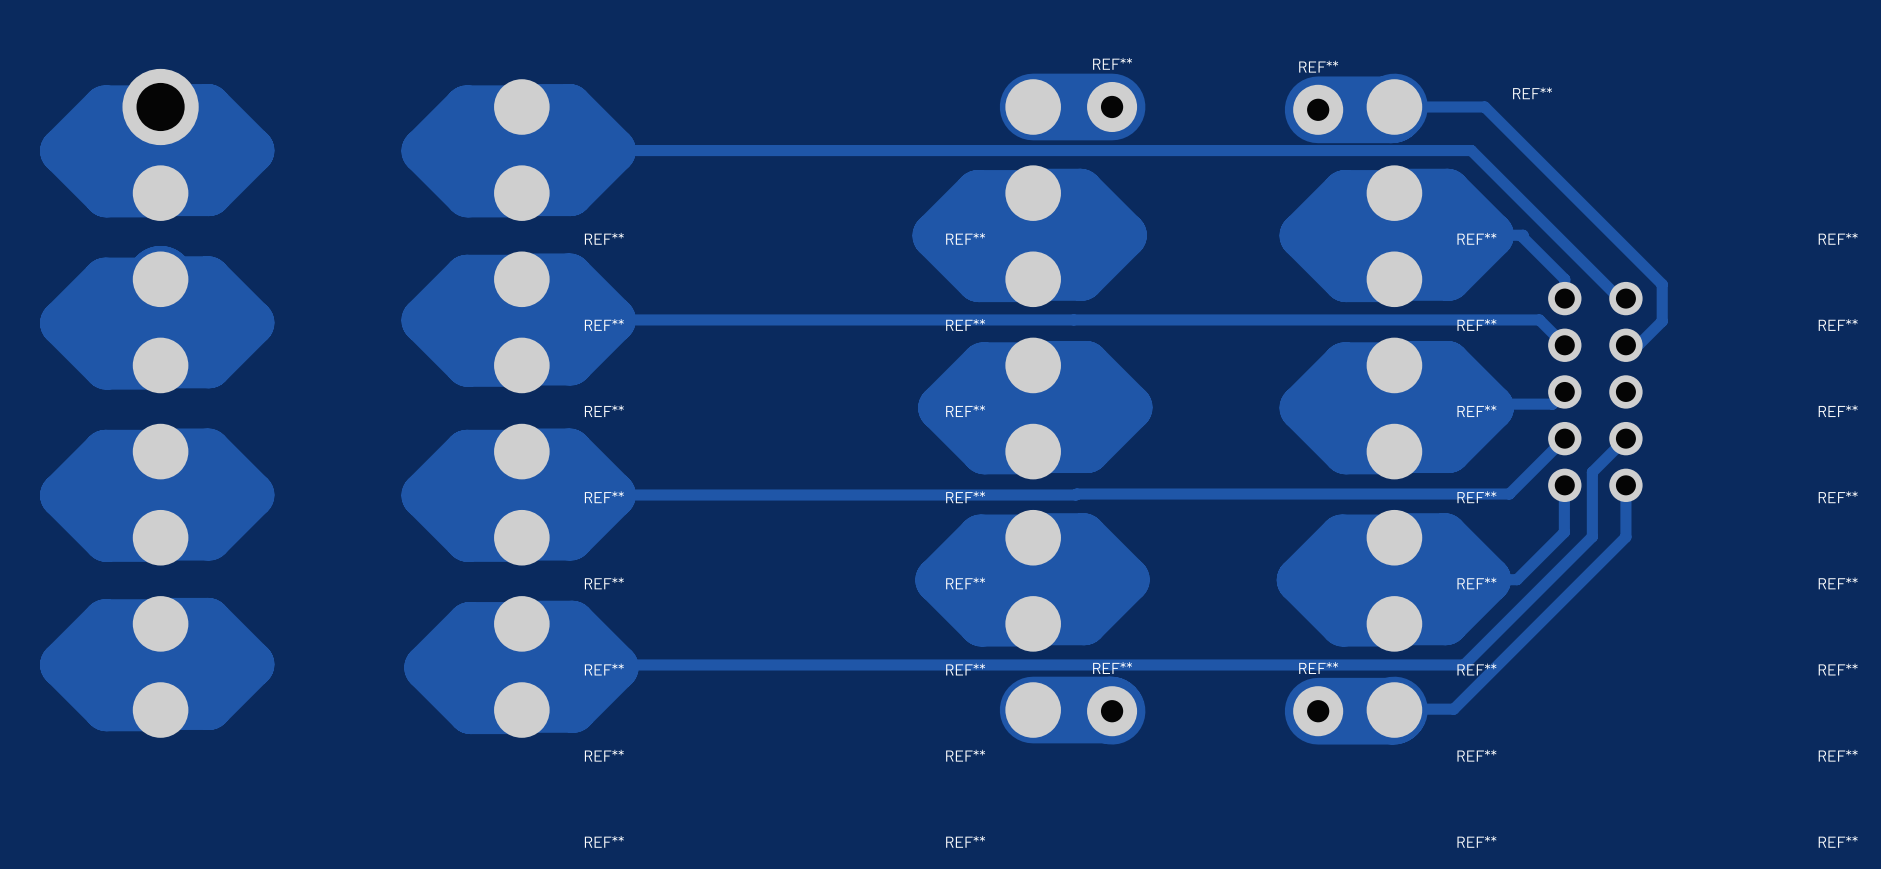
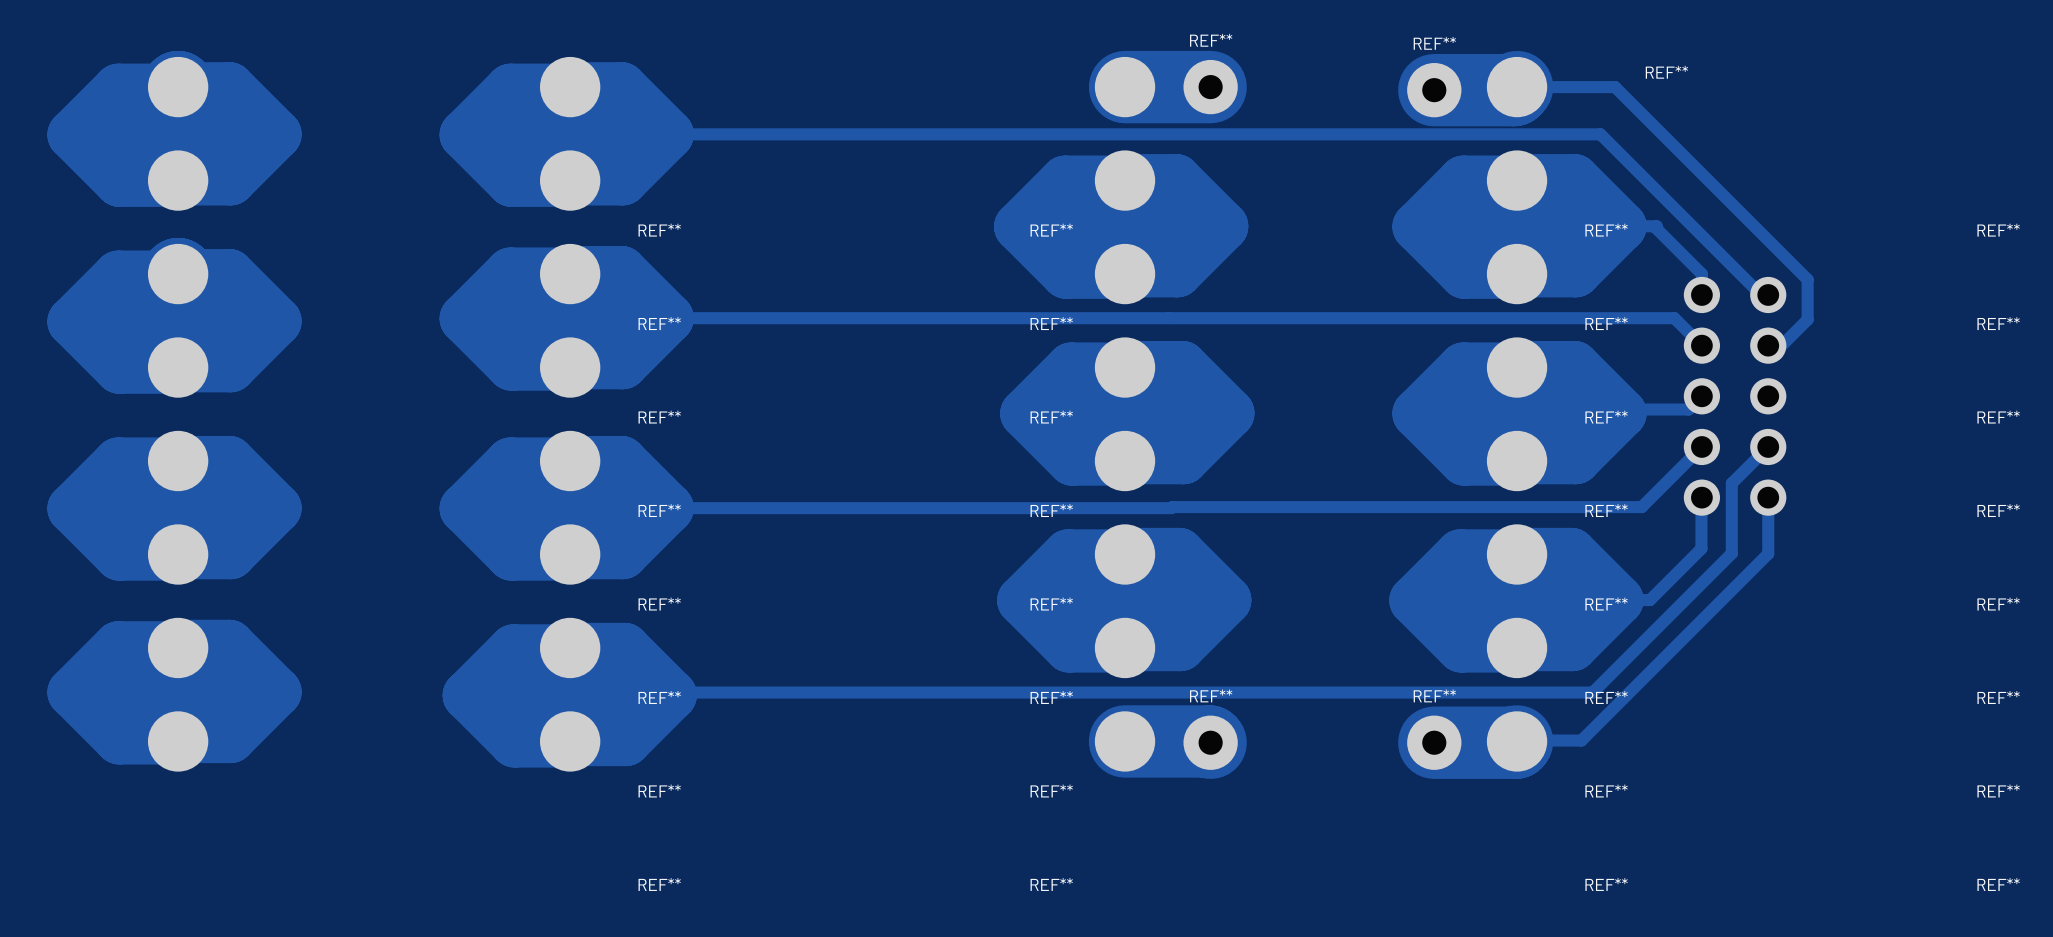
REF** footprint: [122, 68, 199, 146] -> [147, 56, 209, 118]

